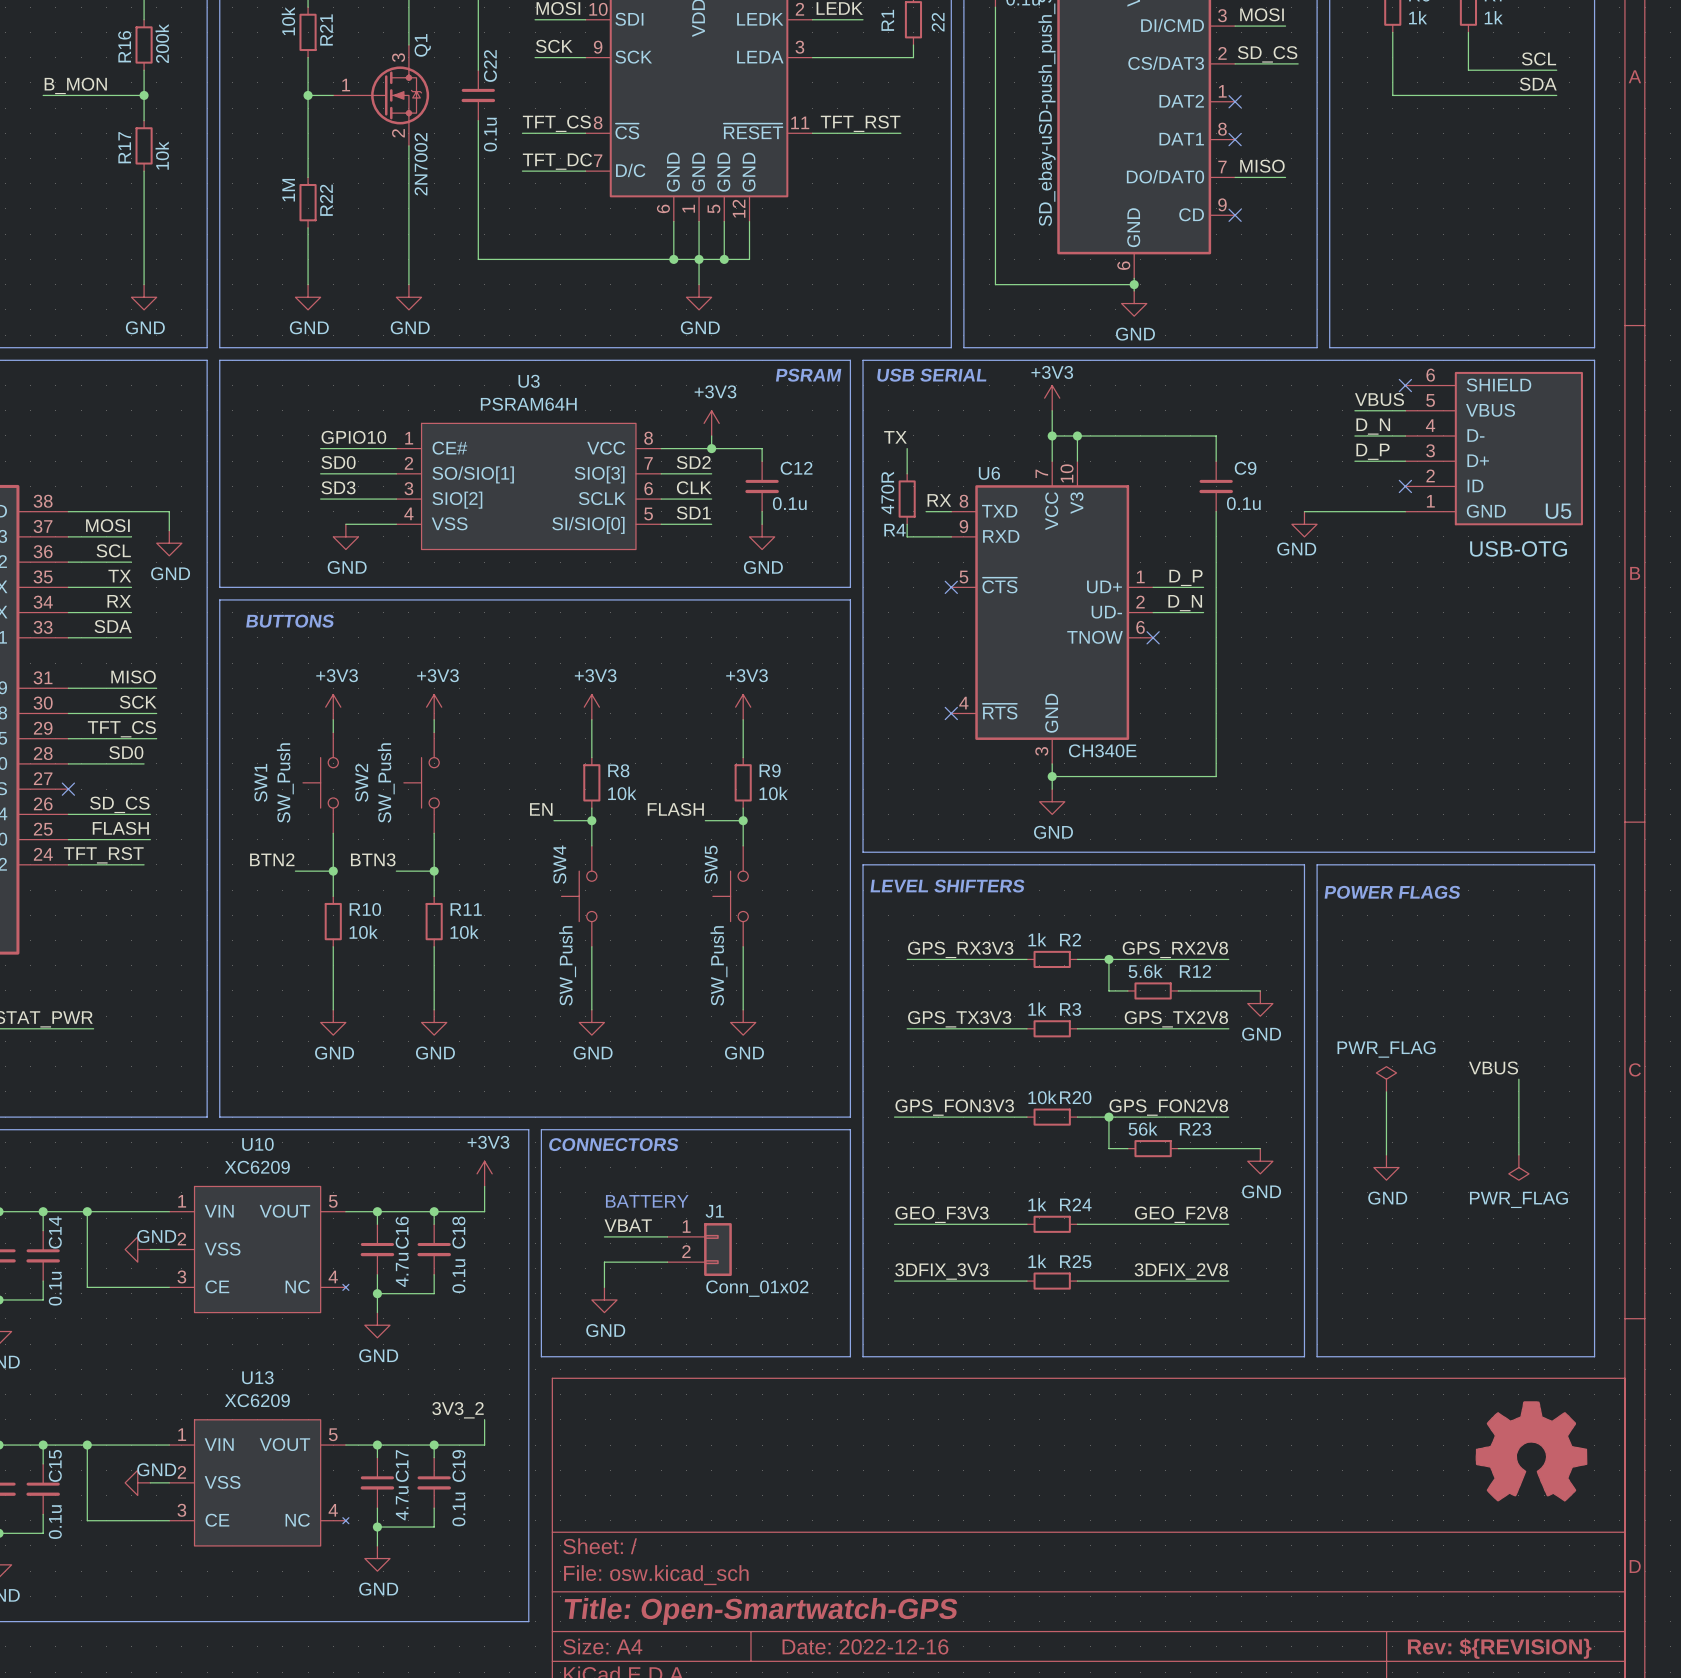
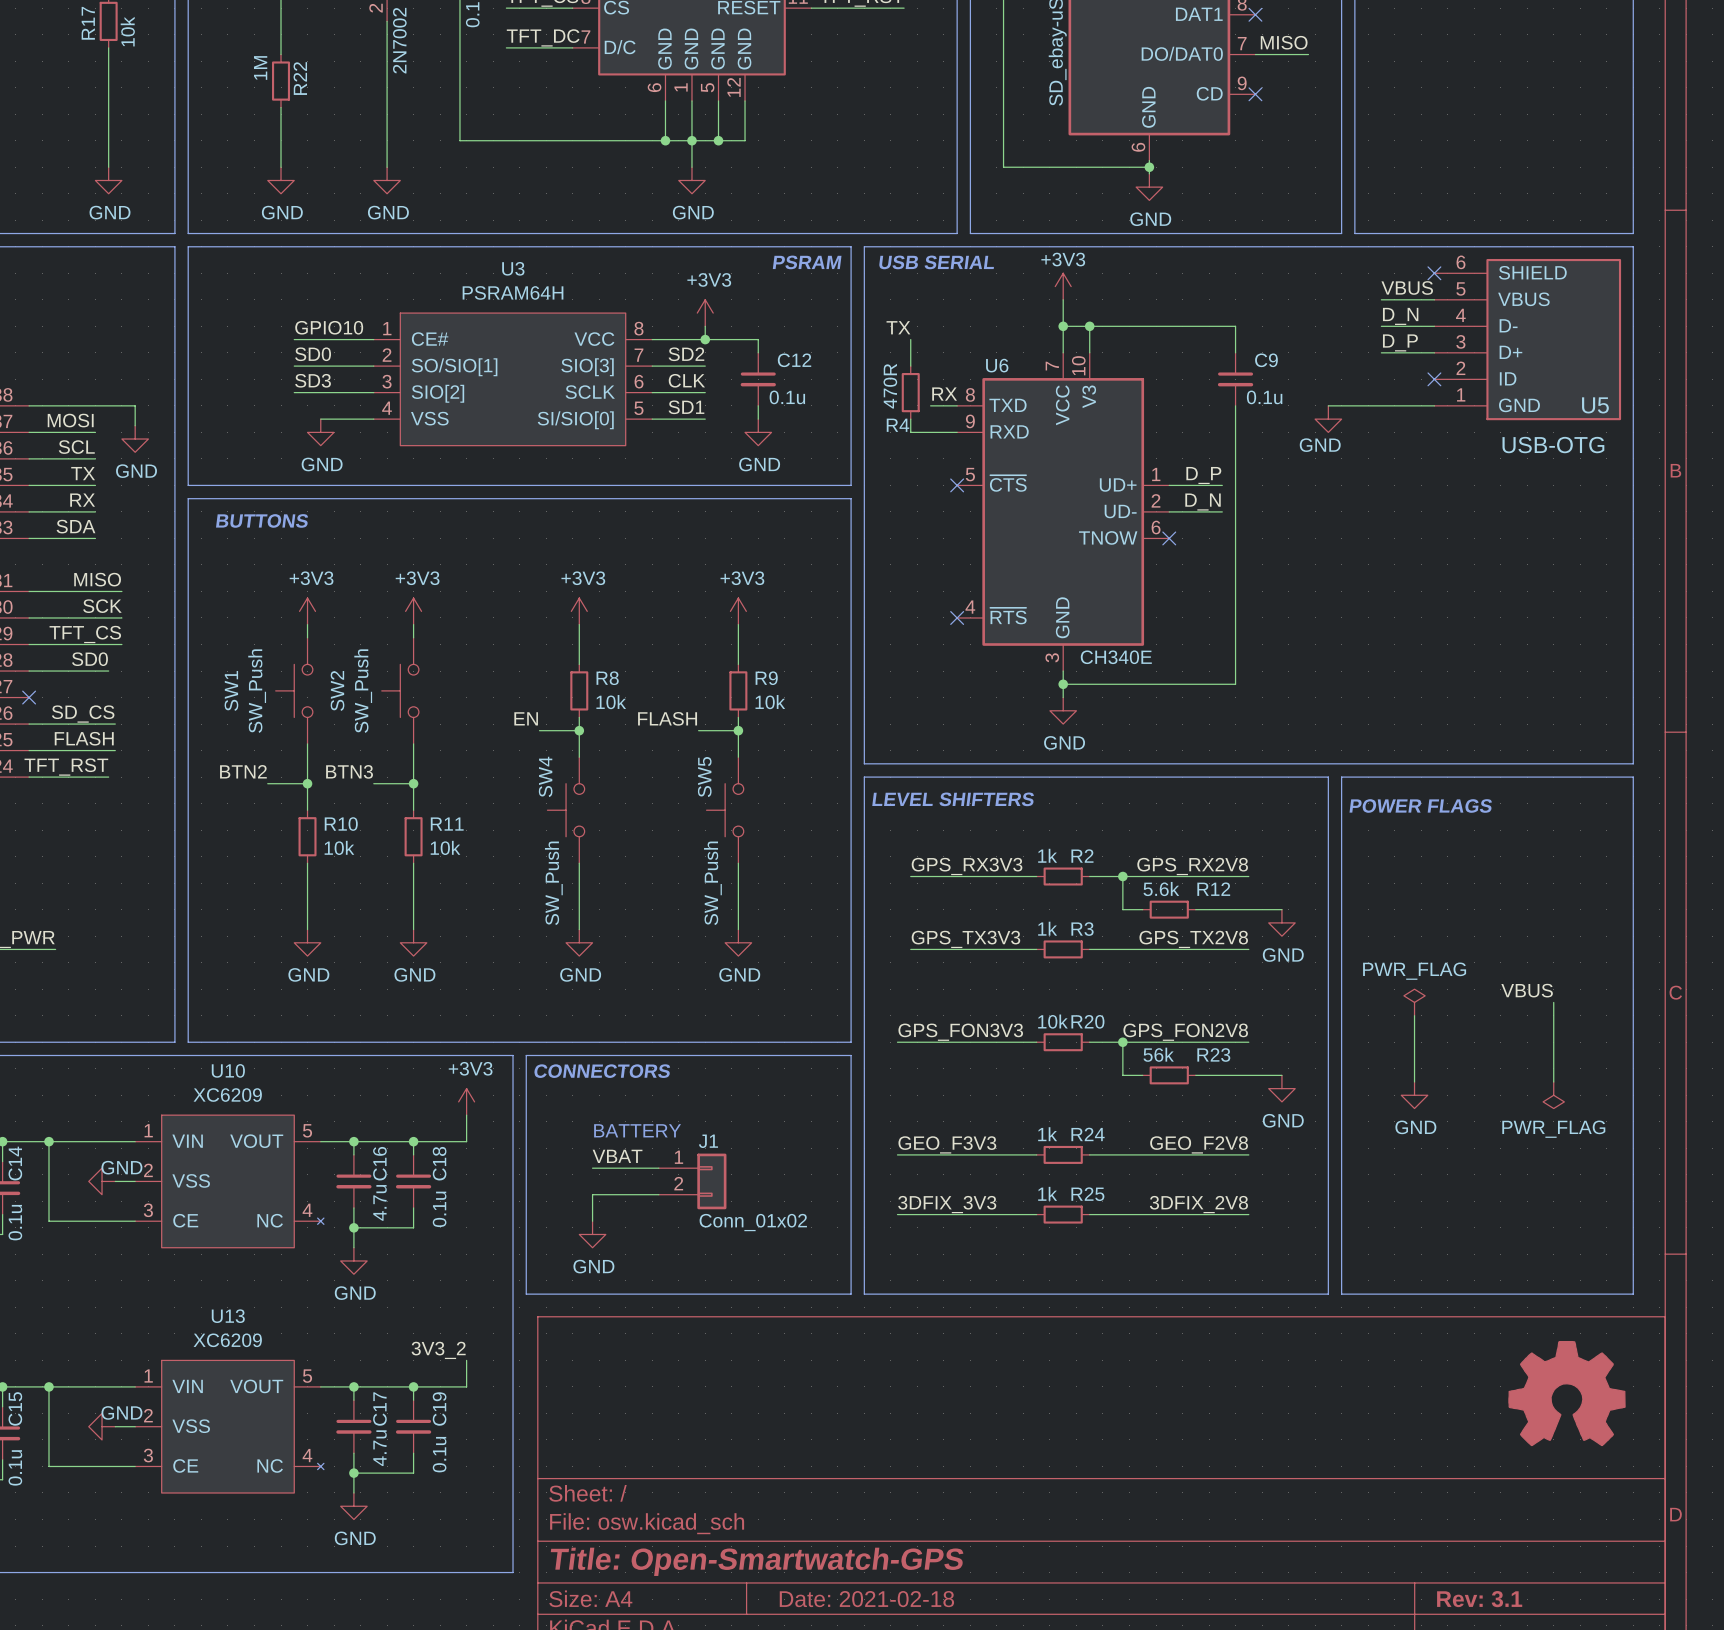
title block: Date: 2022-12-16 (865, 1646) -> Date: 2021-02-18 (866, 1599)
title block: Rev: ${REVISION} (1499, 1648) -> Rev: 3.1 (1479, 1599)

